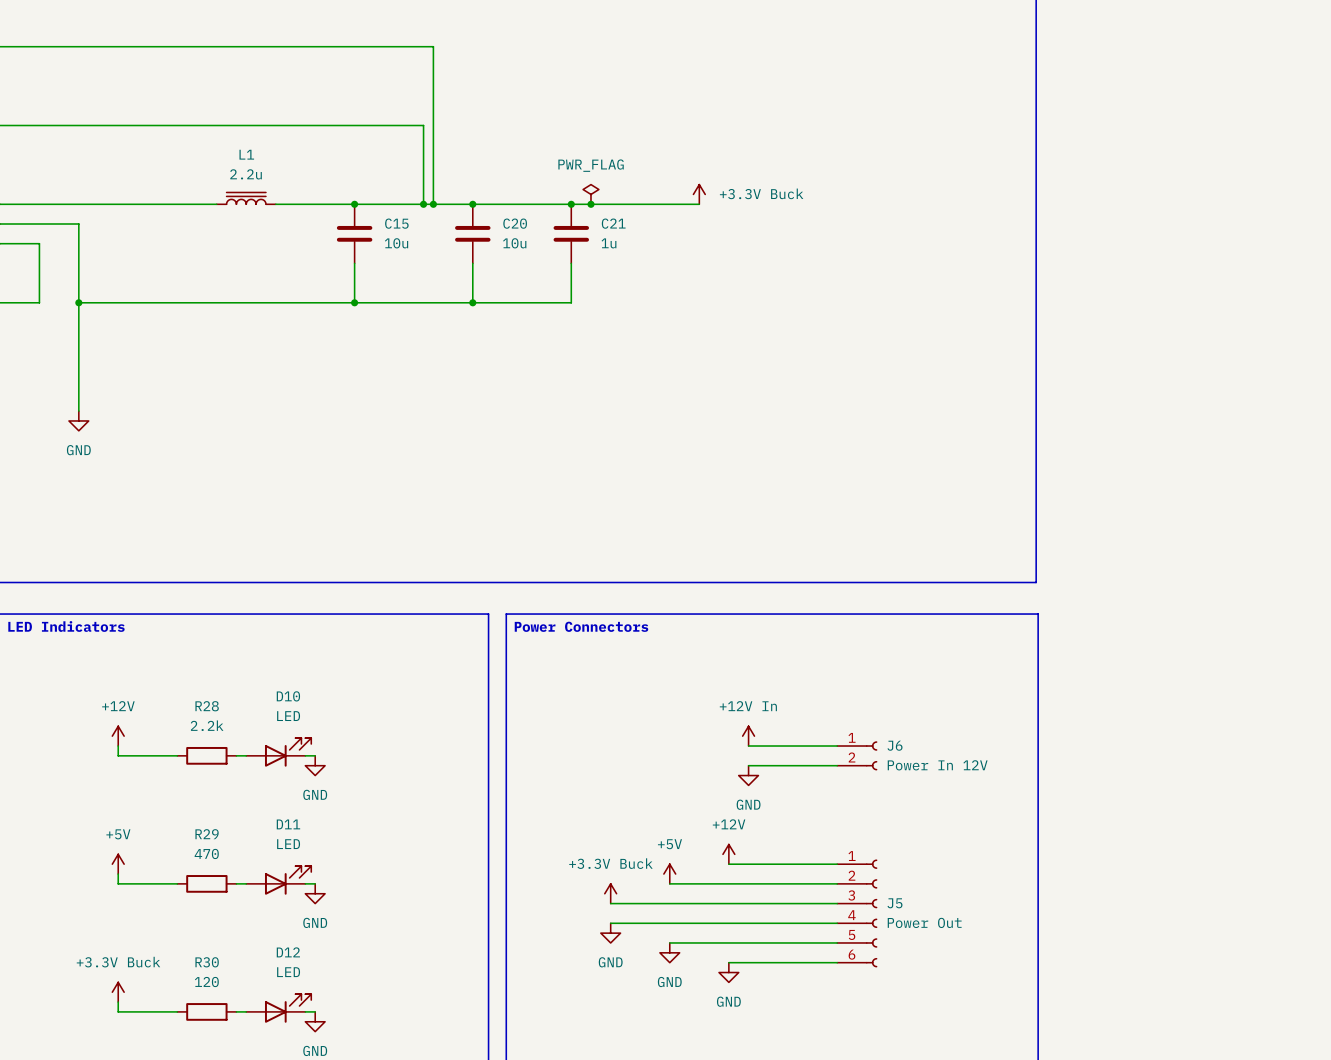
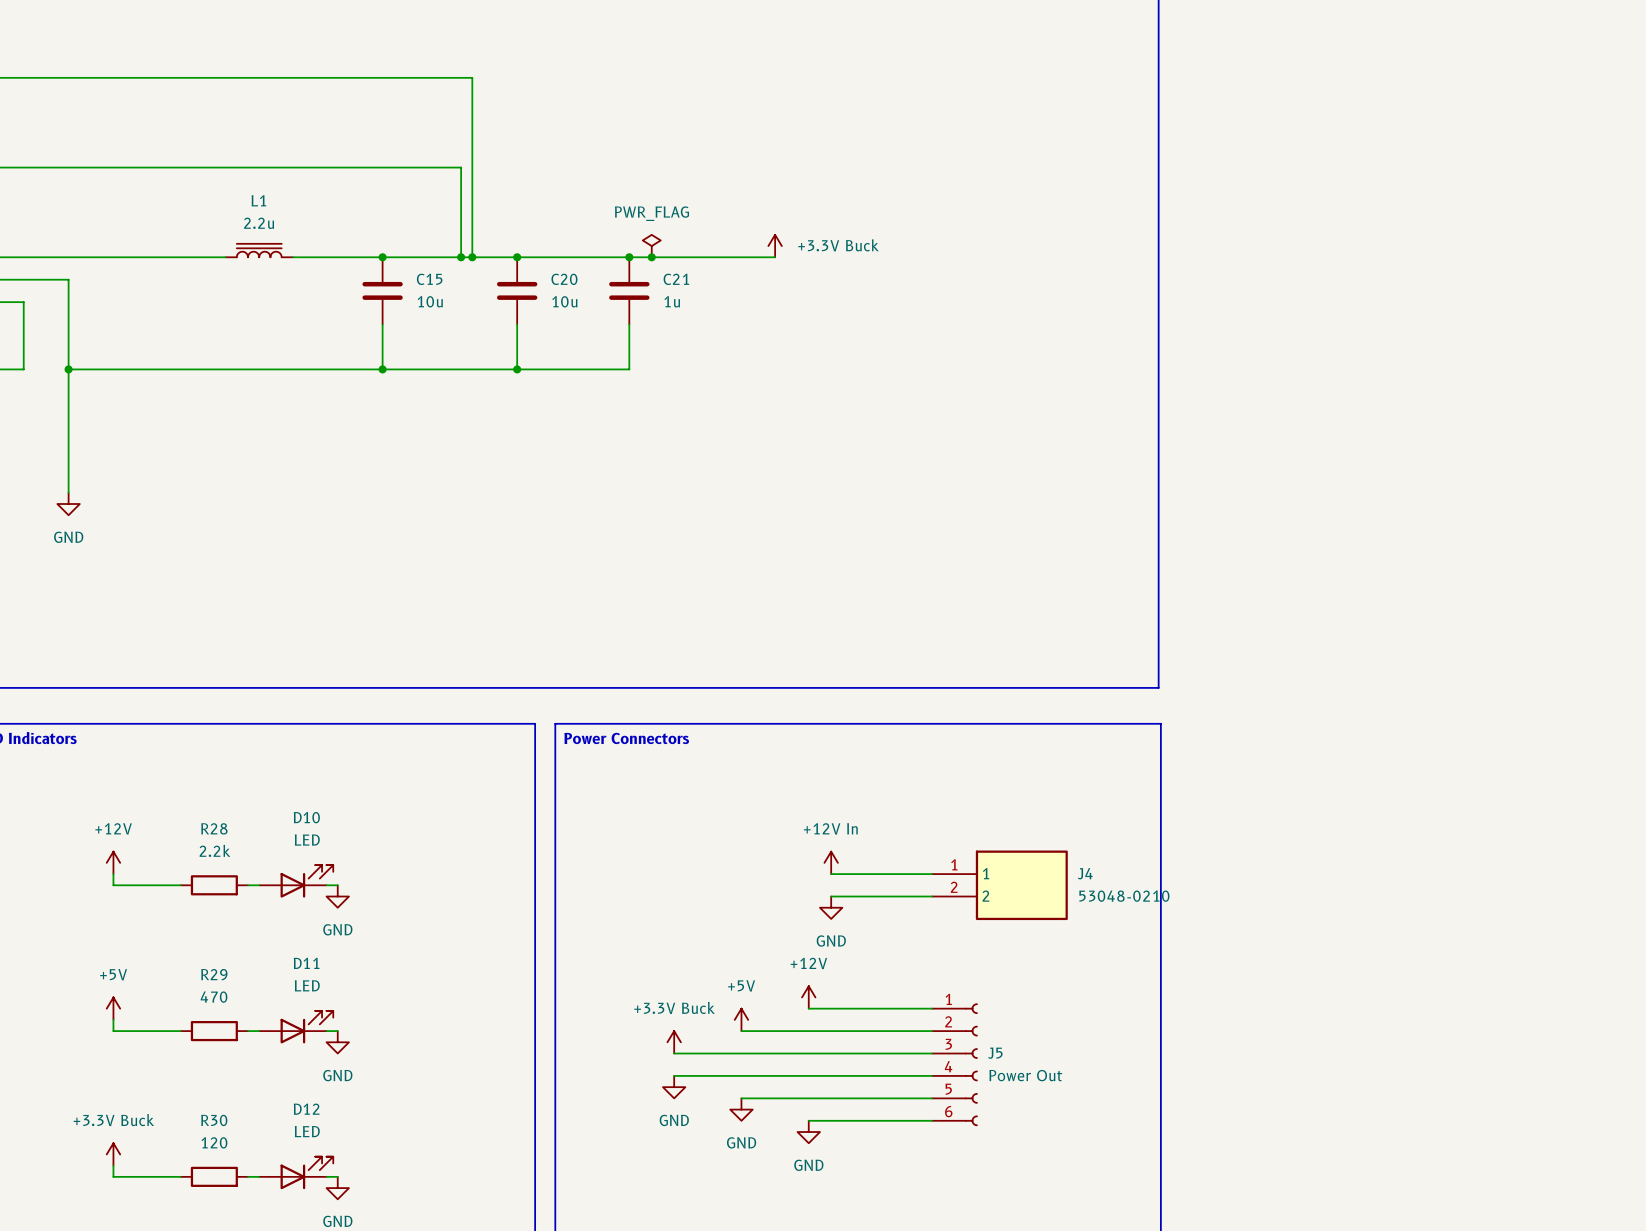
J6: Power In 12V (857, 755) -> none
J4: none -> 53048-0210 (999, 885)

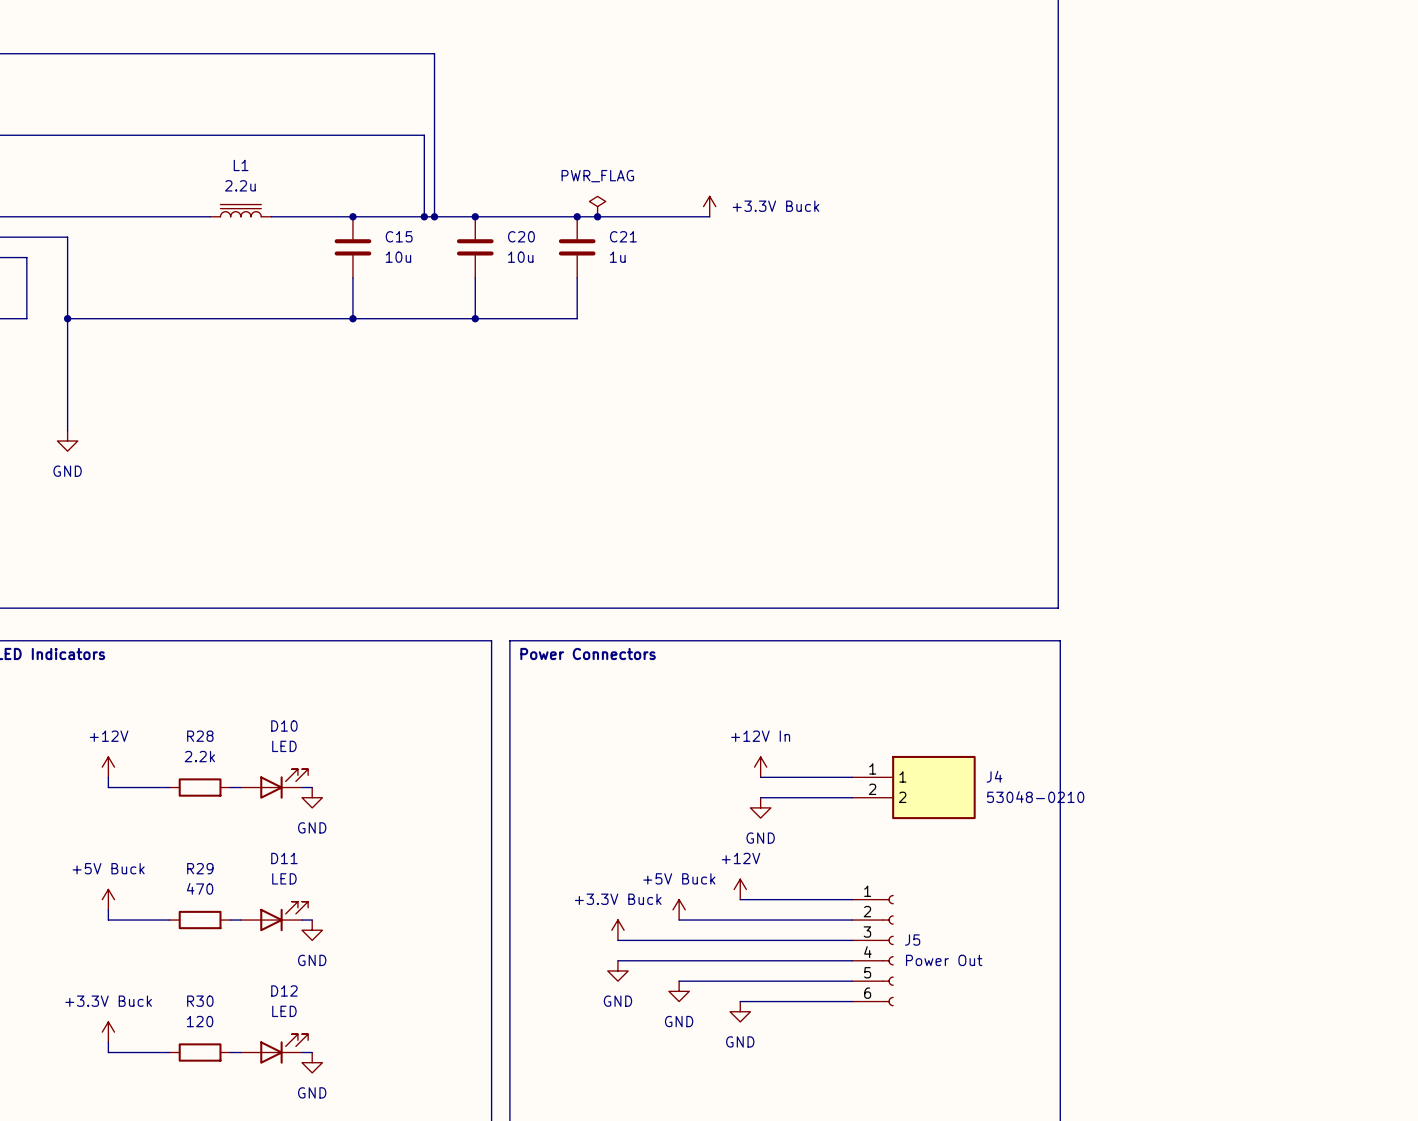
power symbol: +5V (113, 1008) -> +5V Buck (108, 899)
power symbol: +5V (741, 1019) -> +5V Buck (679, 909)

